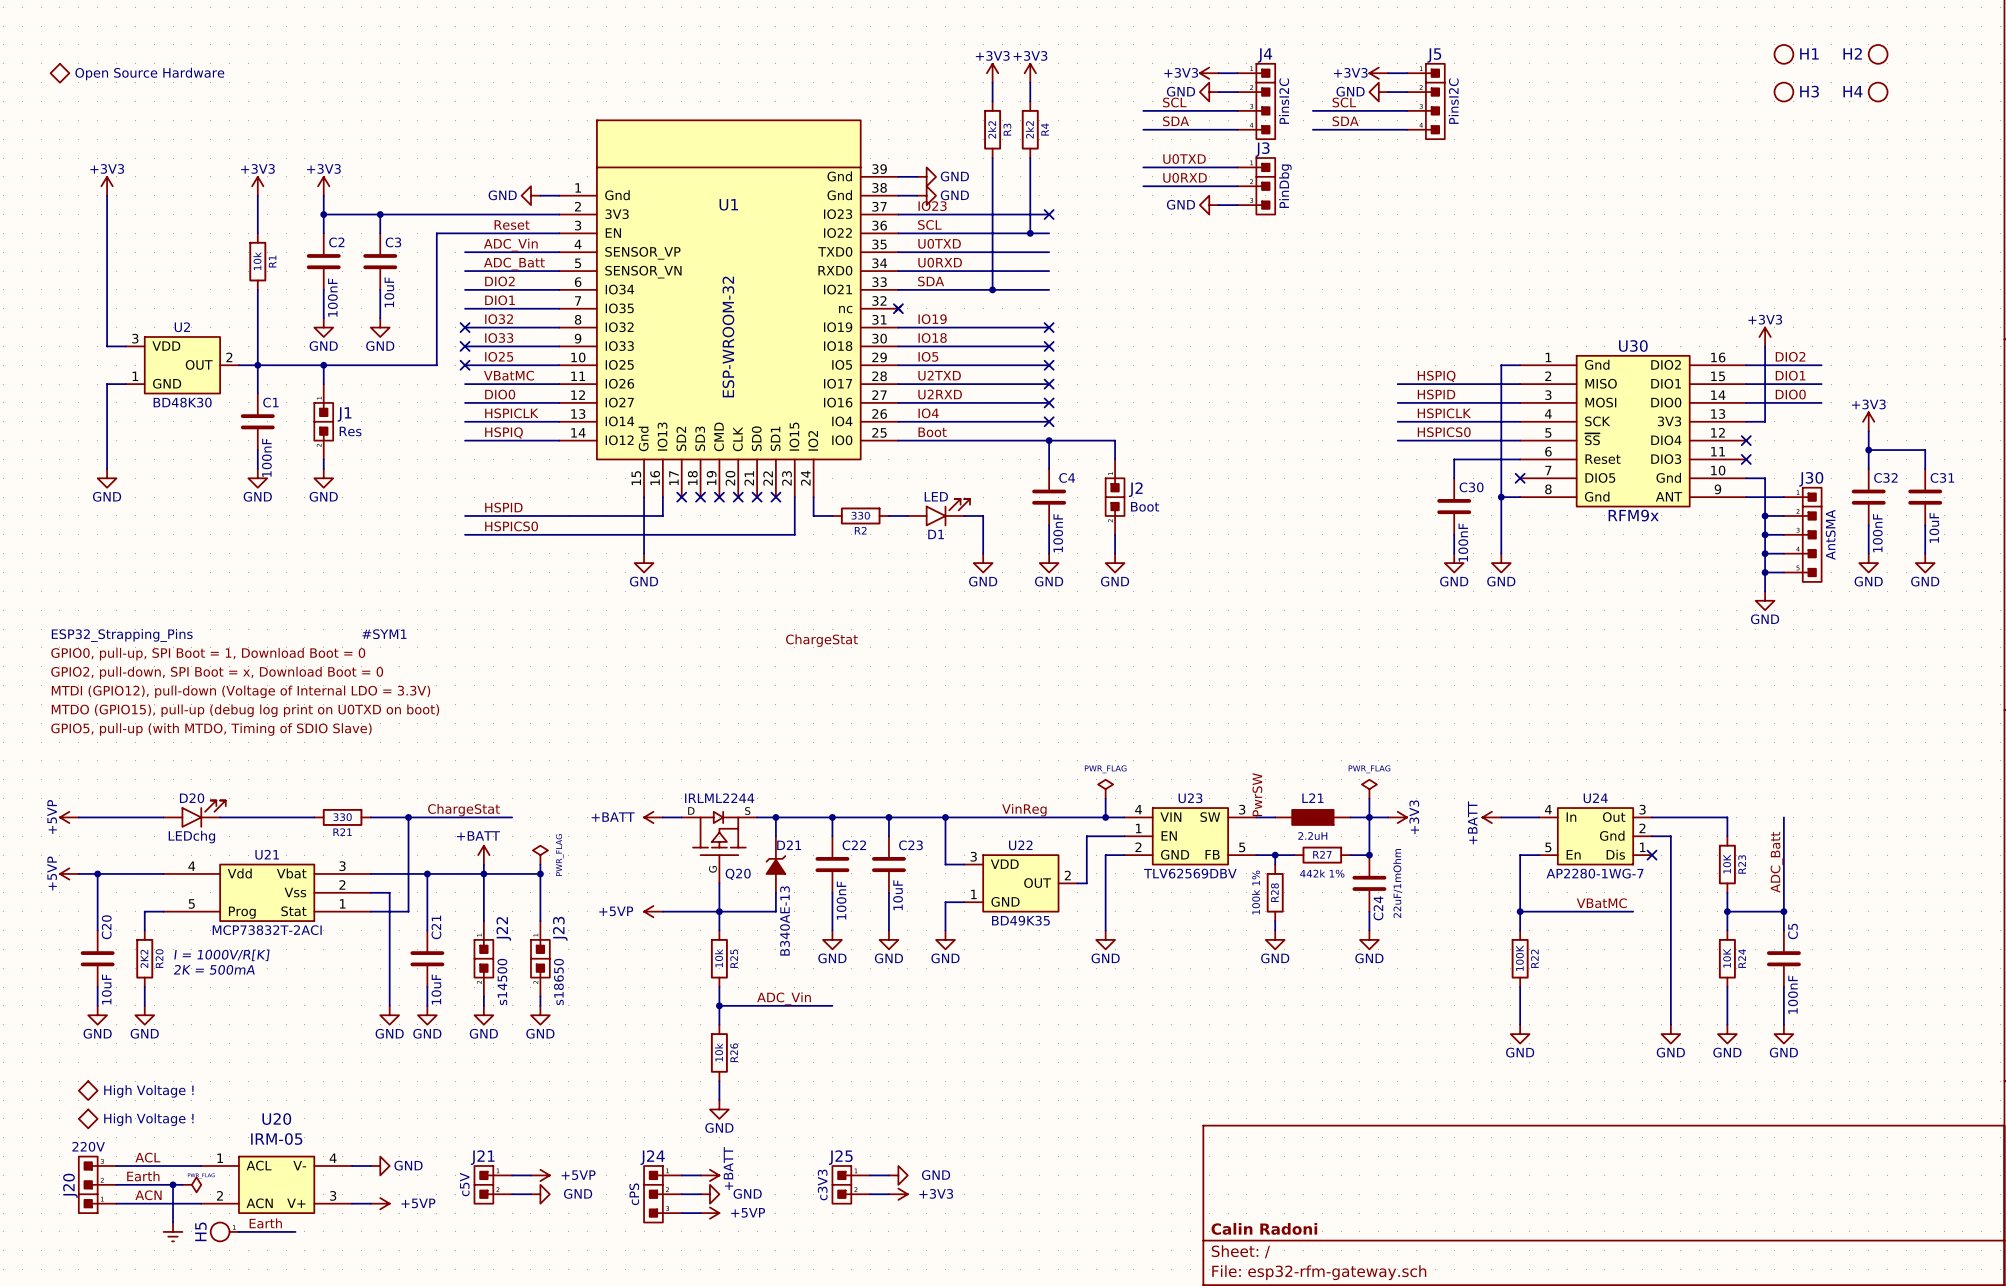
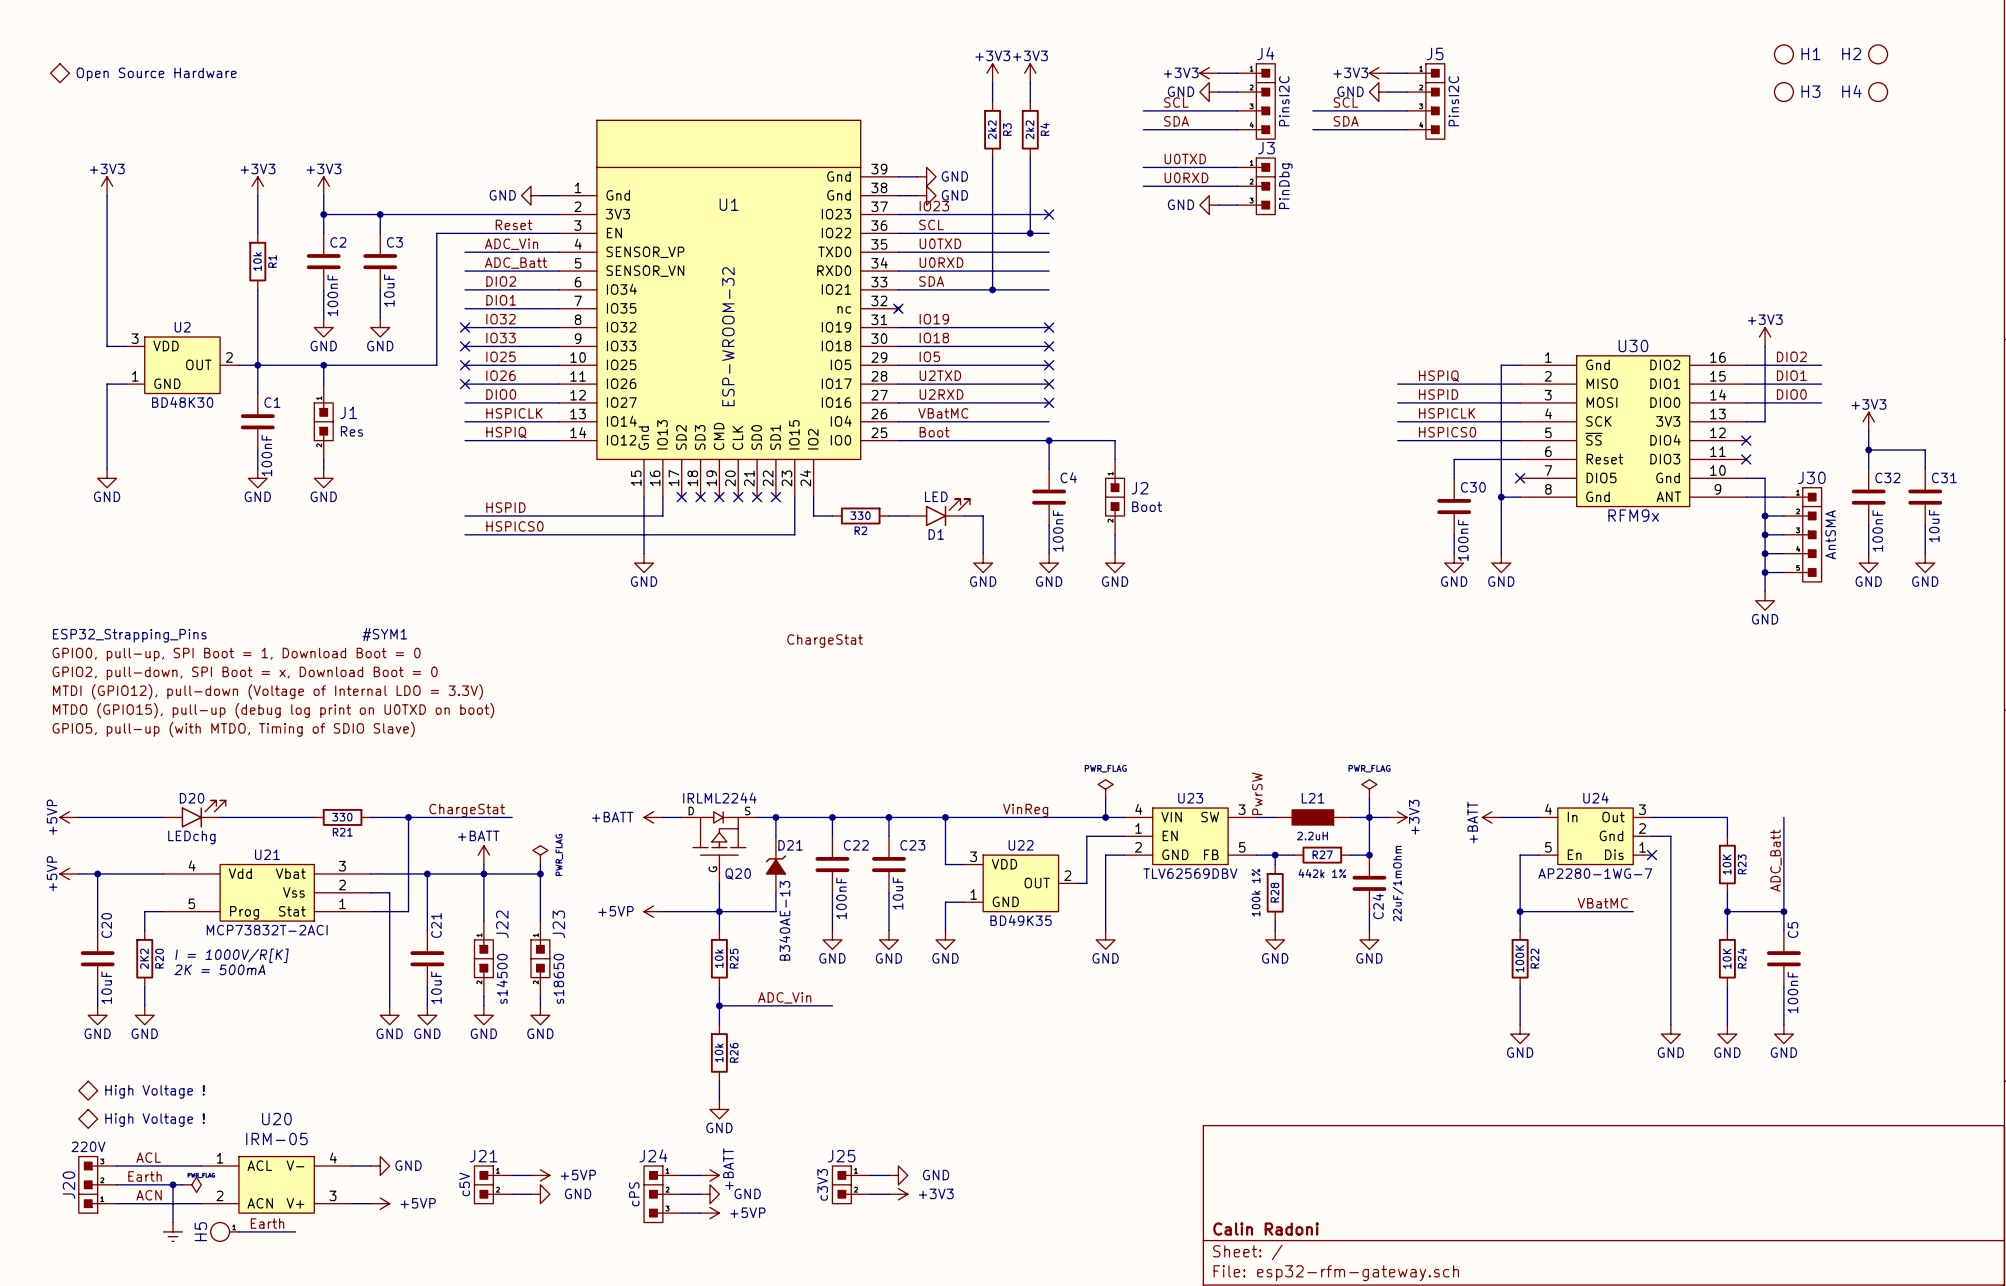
label: VBatMC (509, 375) -> IO26 (501, 375)
no-connect mark: none -> (465, 384)
label: IO4 (928, 413) -> VBatMC (943, 413)
no-connect mark: (1049, 421) -> none

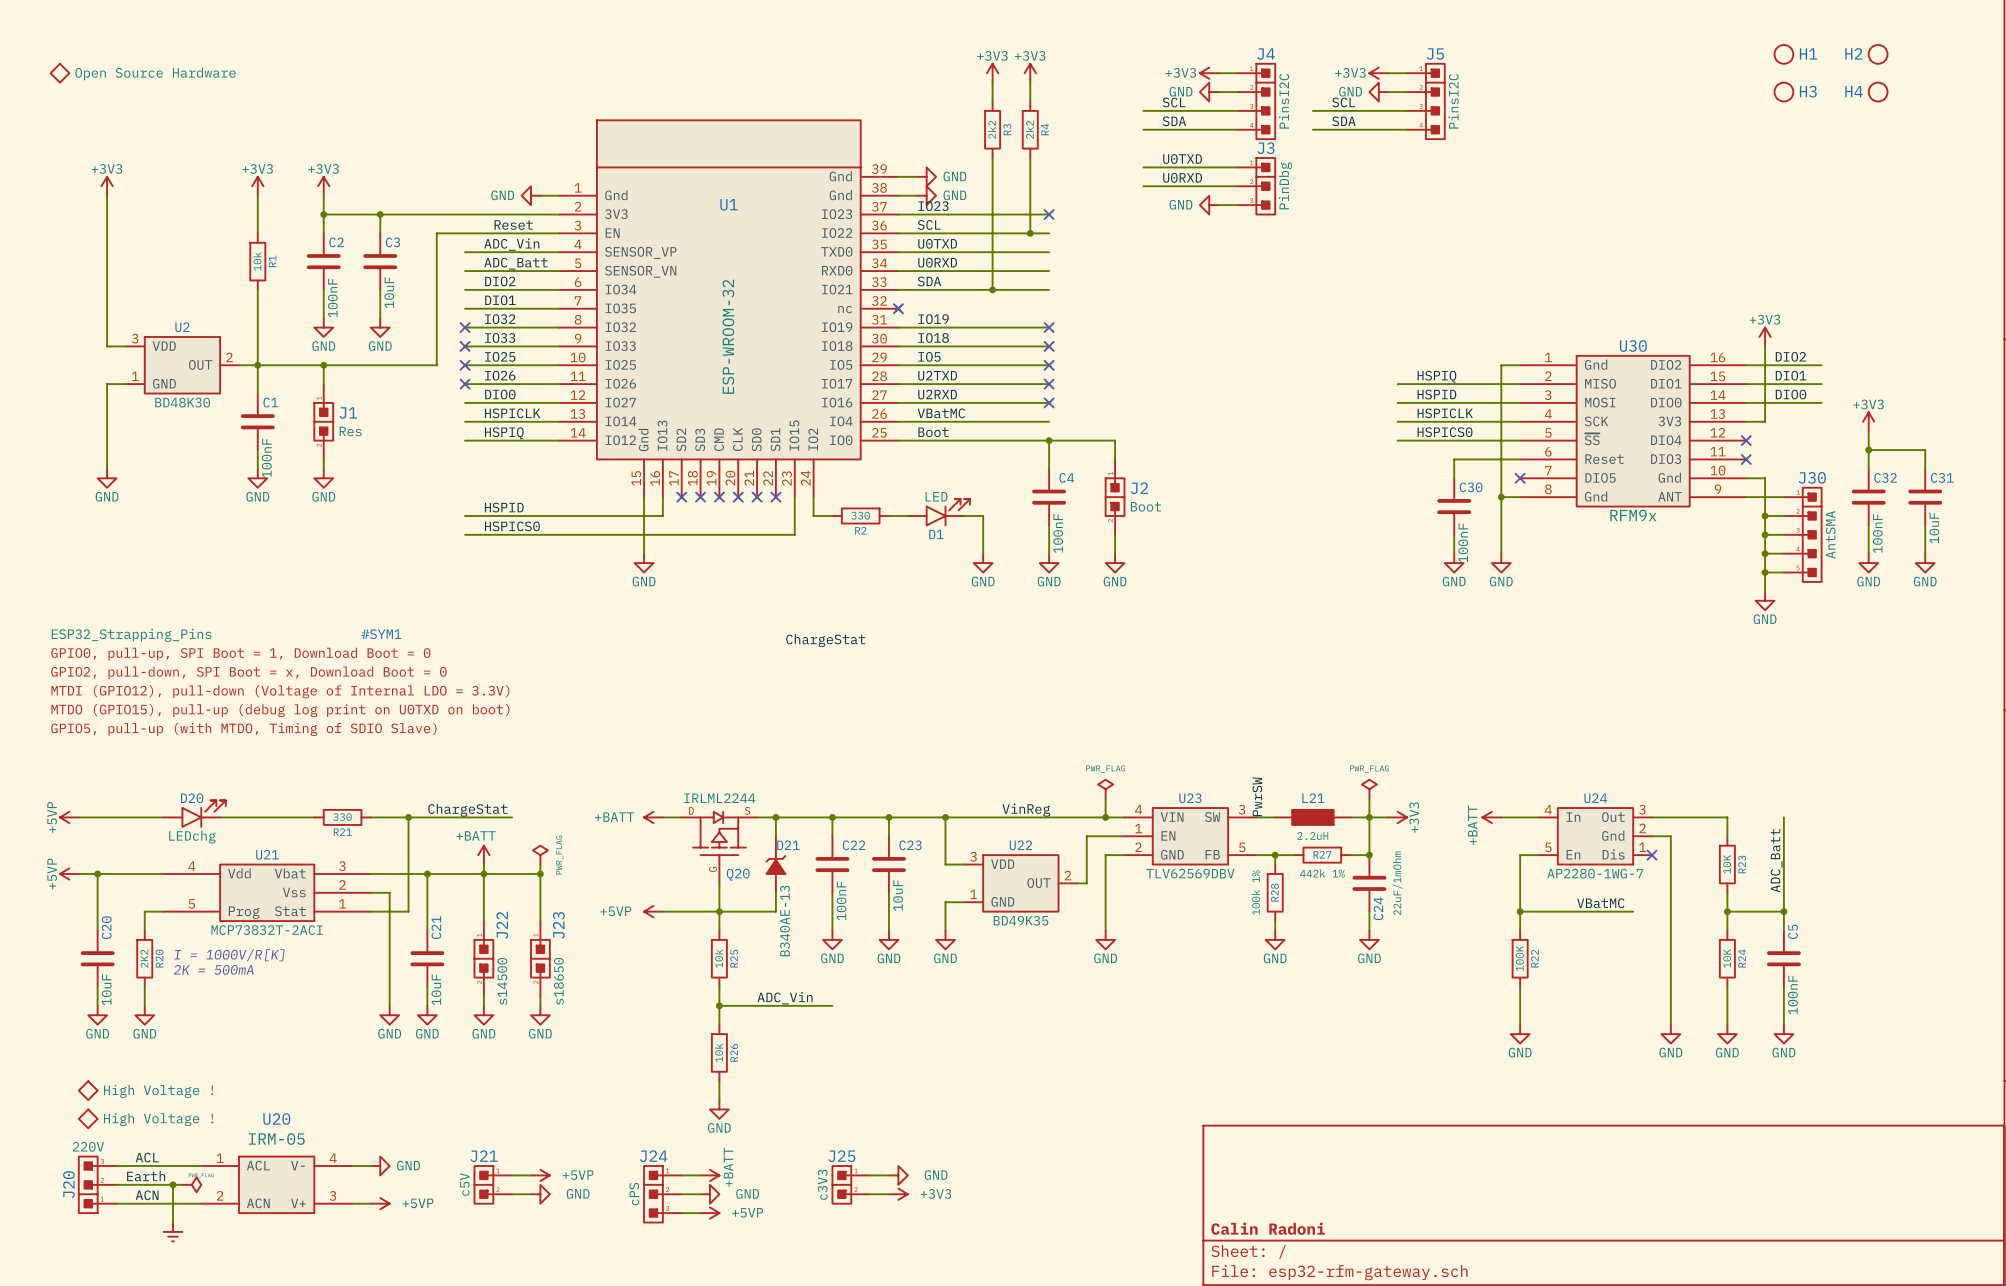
label: Earth (267, 1223) -> none
H5: (224, 1231) -> none
wire: (238, 1231) (295, 1231) -> none

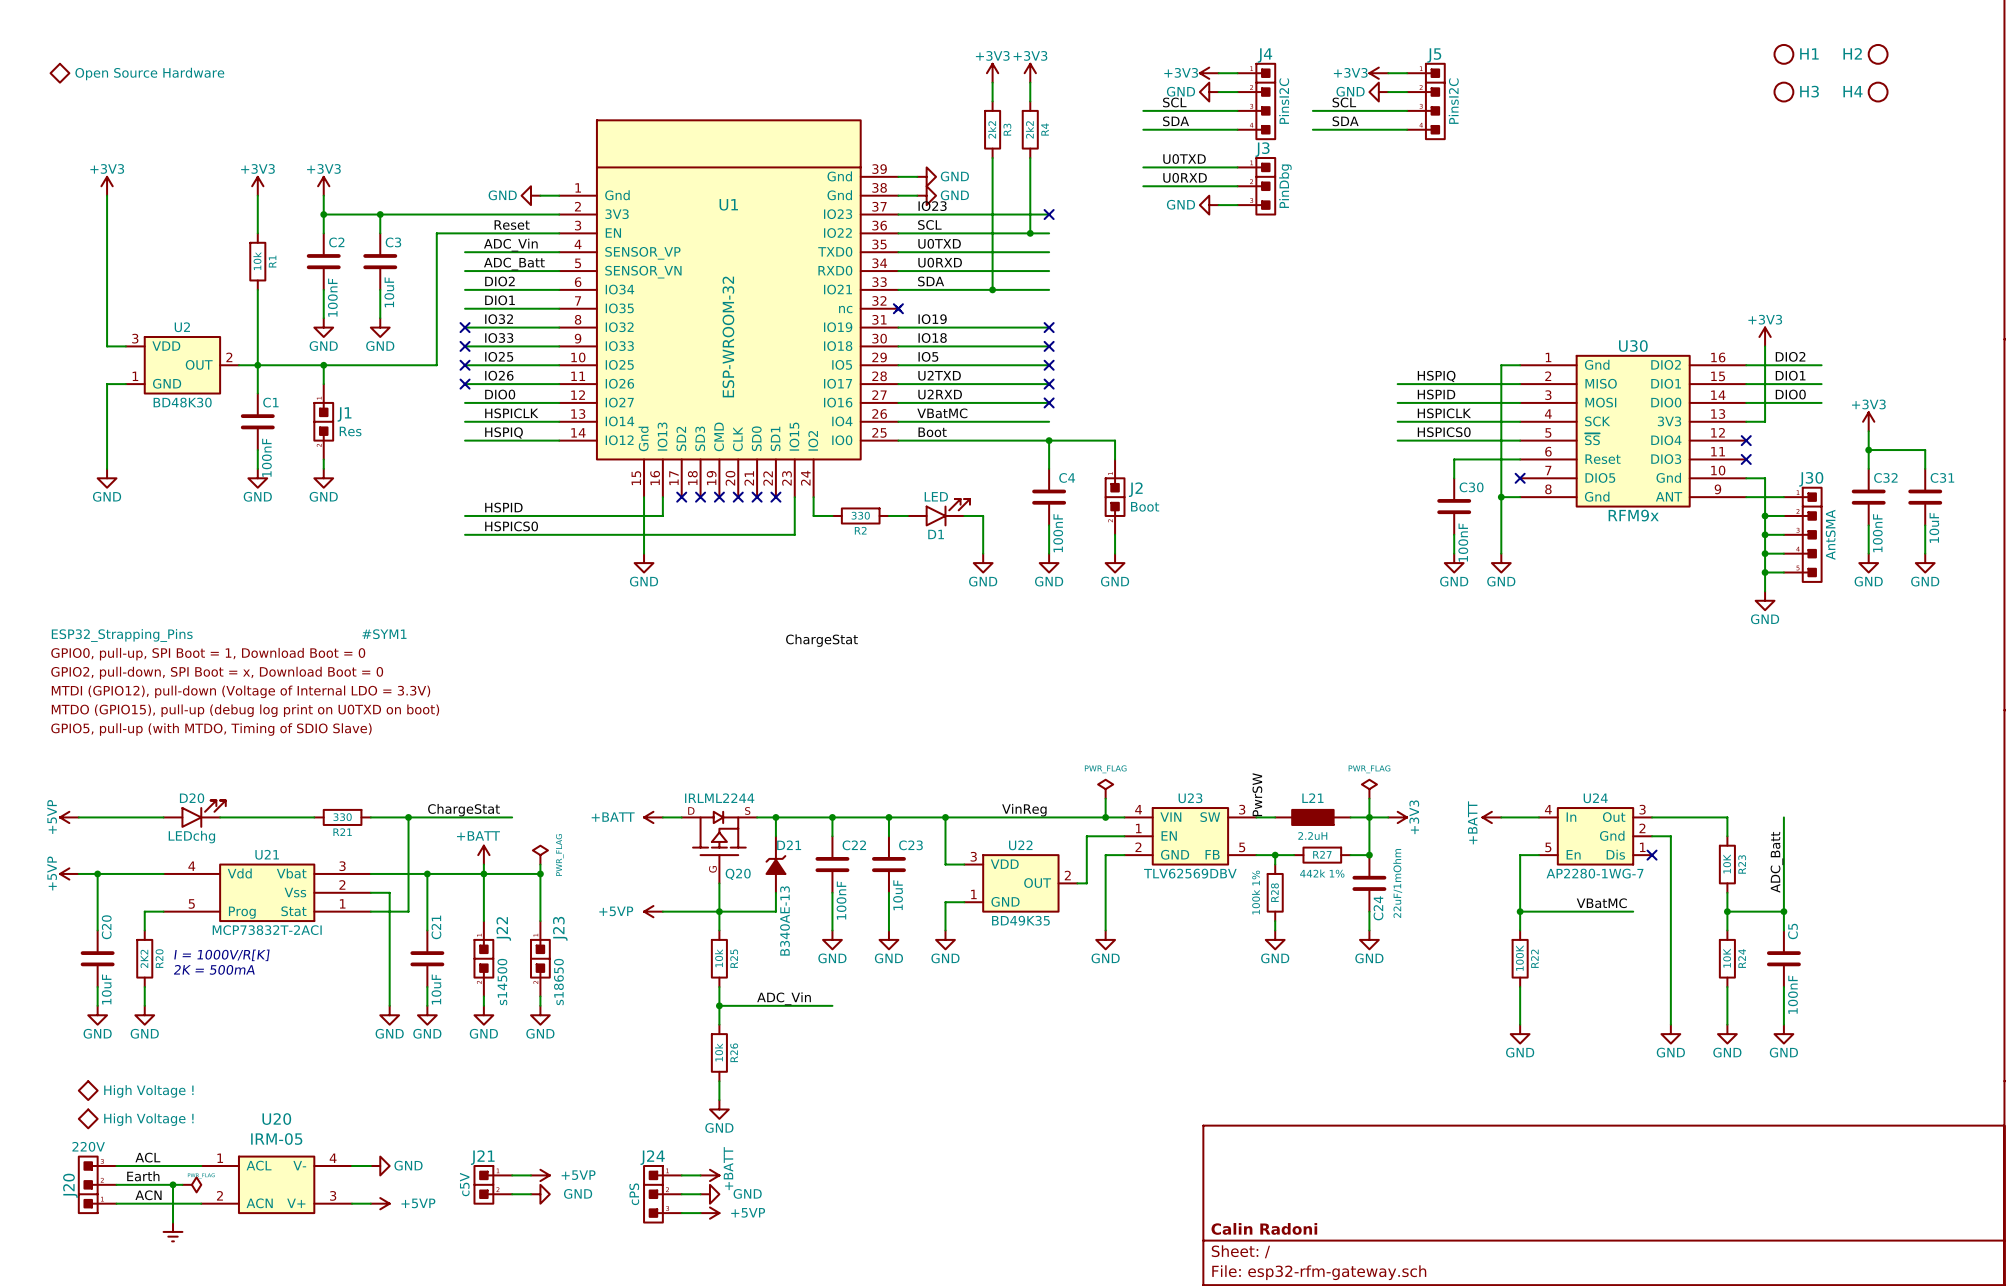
wire: (870, 1175) (888, 1175) -> none
power symbol: GND (898, 1175) -> none
J25: c3V3 (851, 1184) -> none
wire: (870, 1194) (888, 1194) -> none
power symbol: +3V3 (898, 1194) -> none

